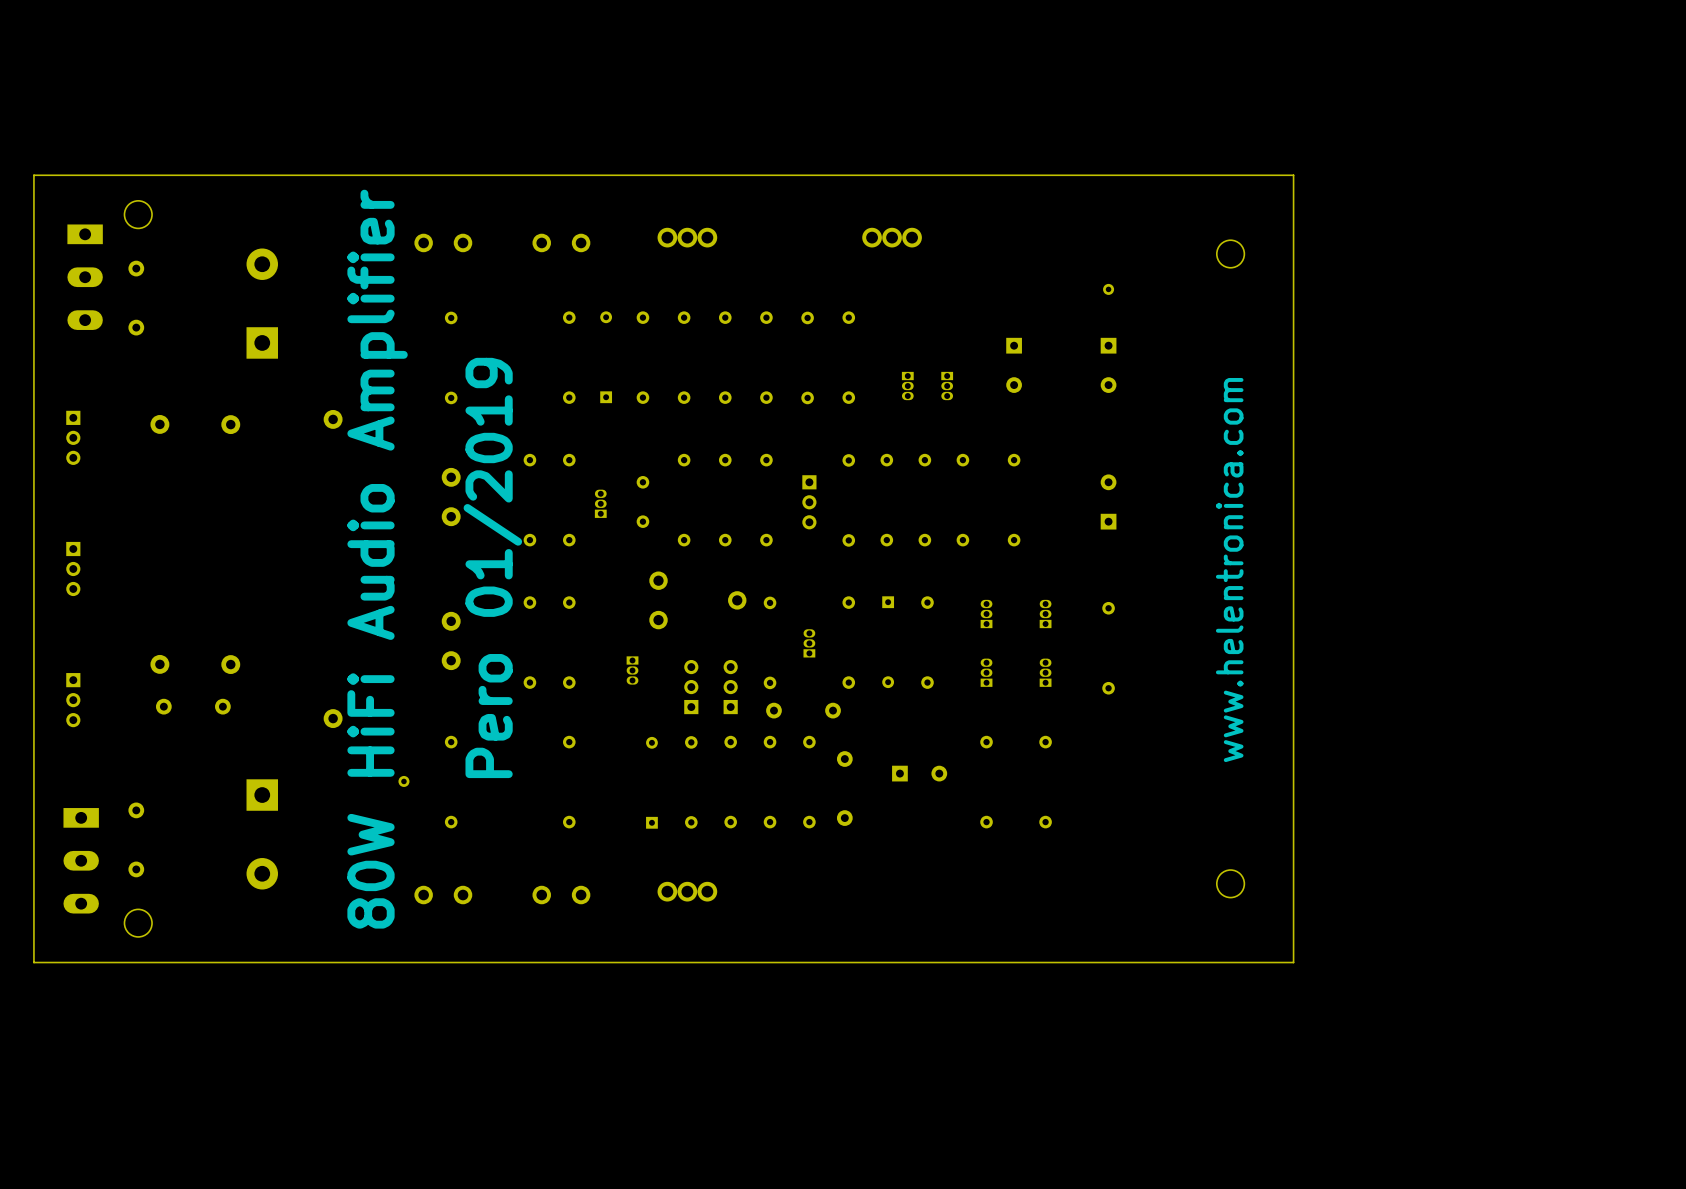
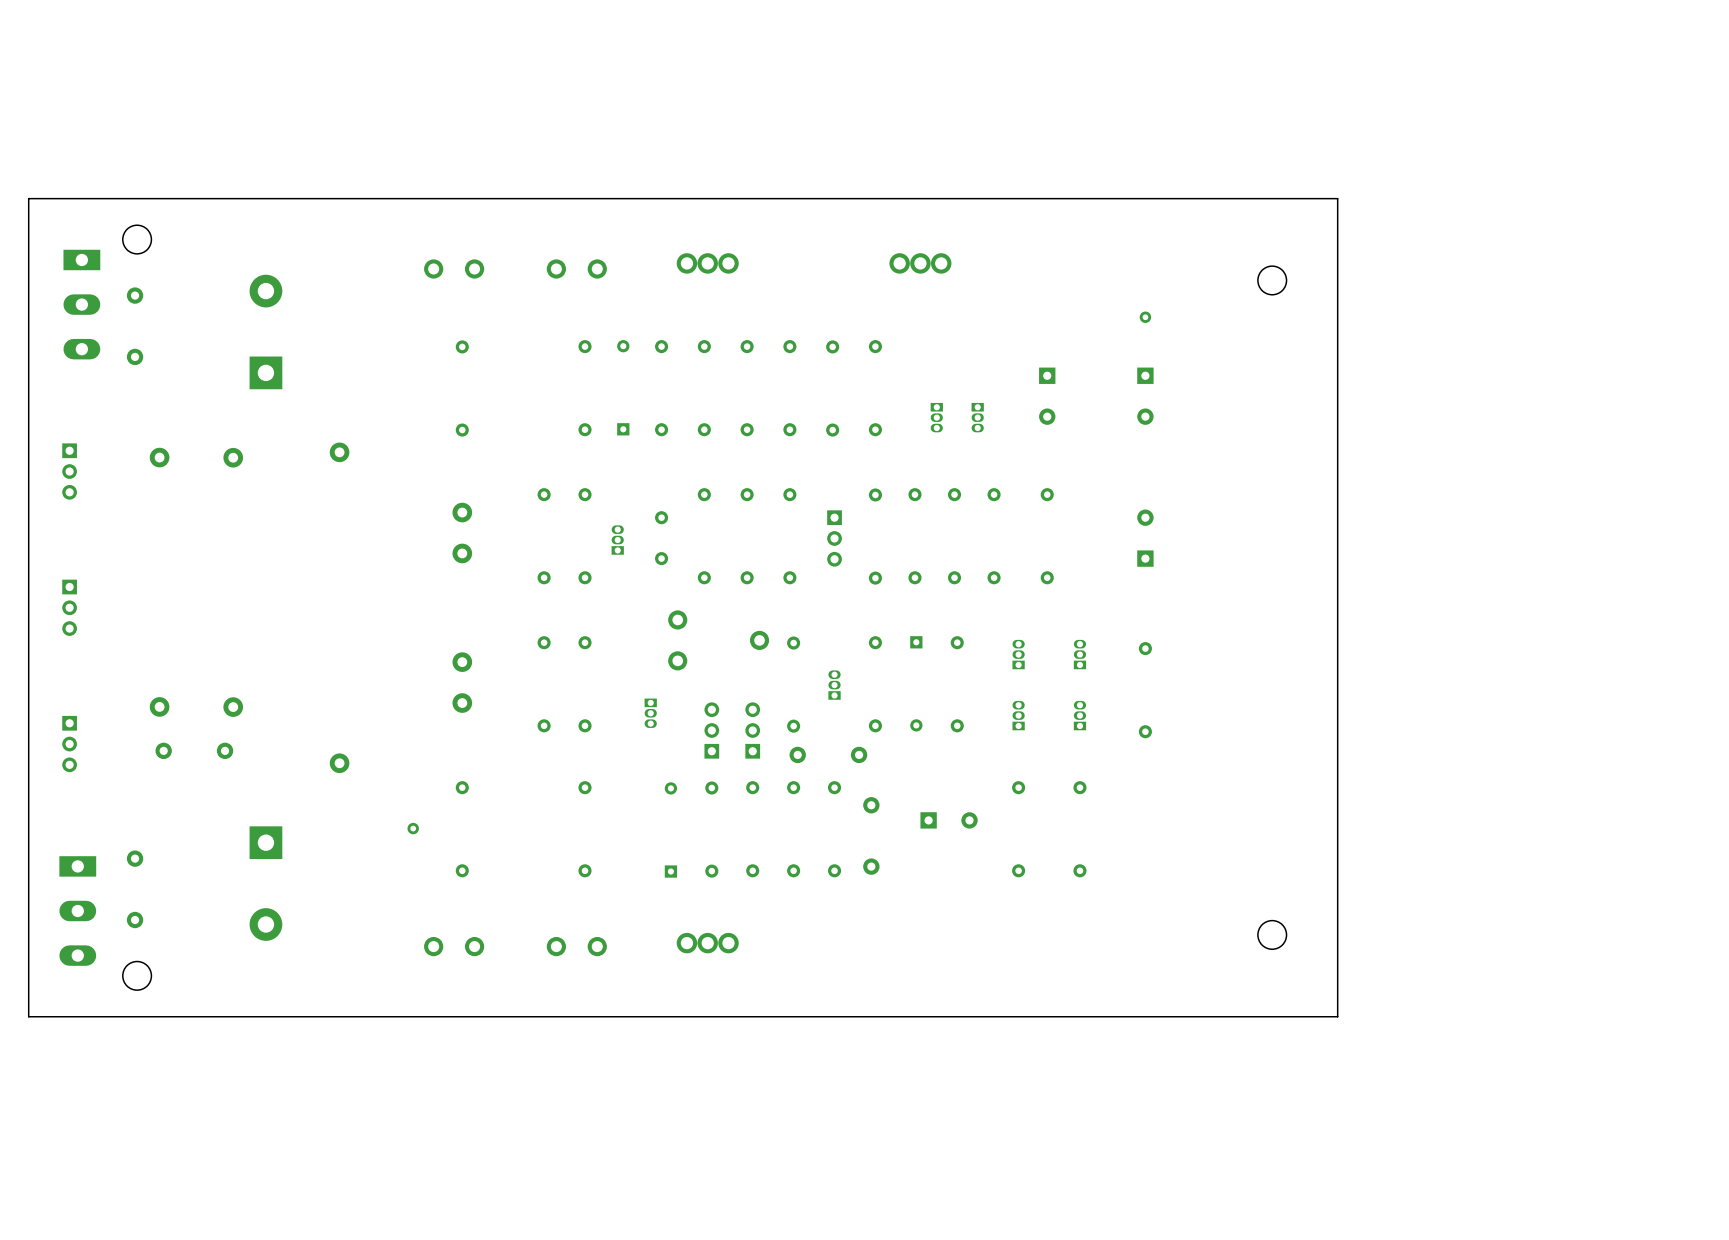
text: 80W HiFi Audio Amplifier (377, 559) -> none
text: Pero 01/2019 (492, 567) -> none
text: www.helentronica.com (1229, 570) -> none

